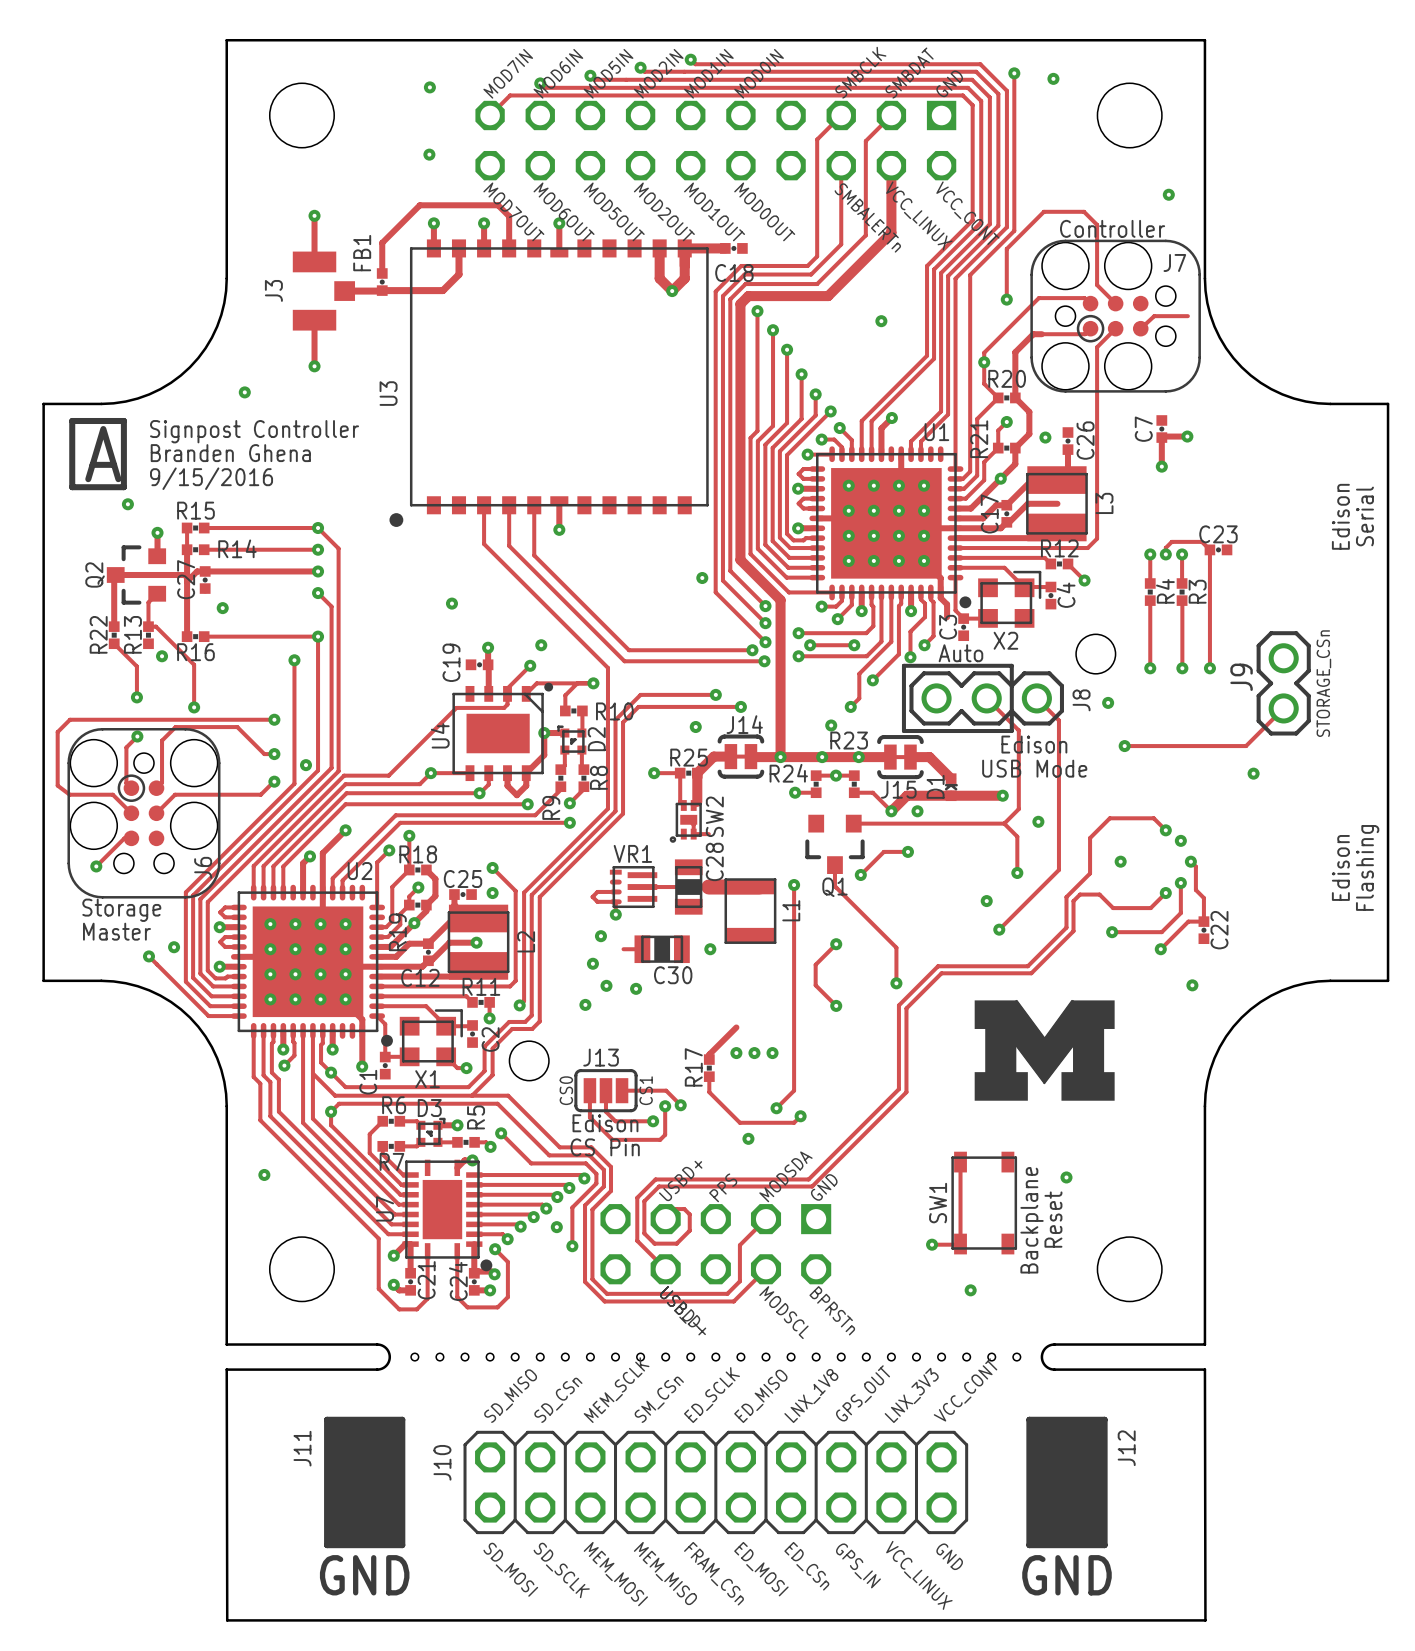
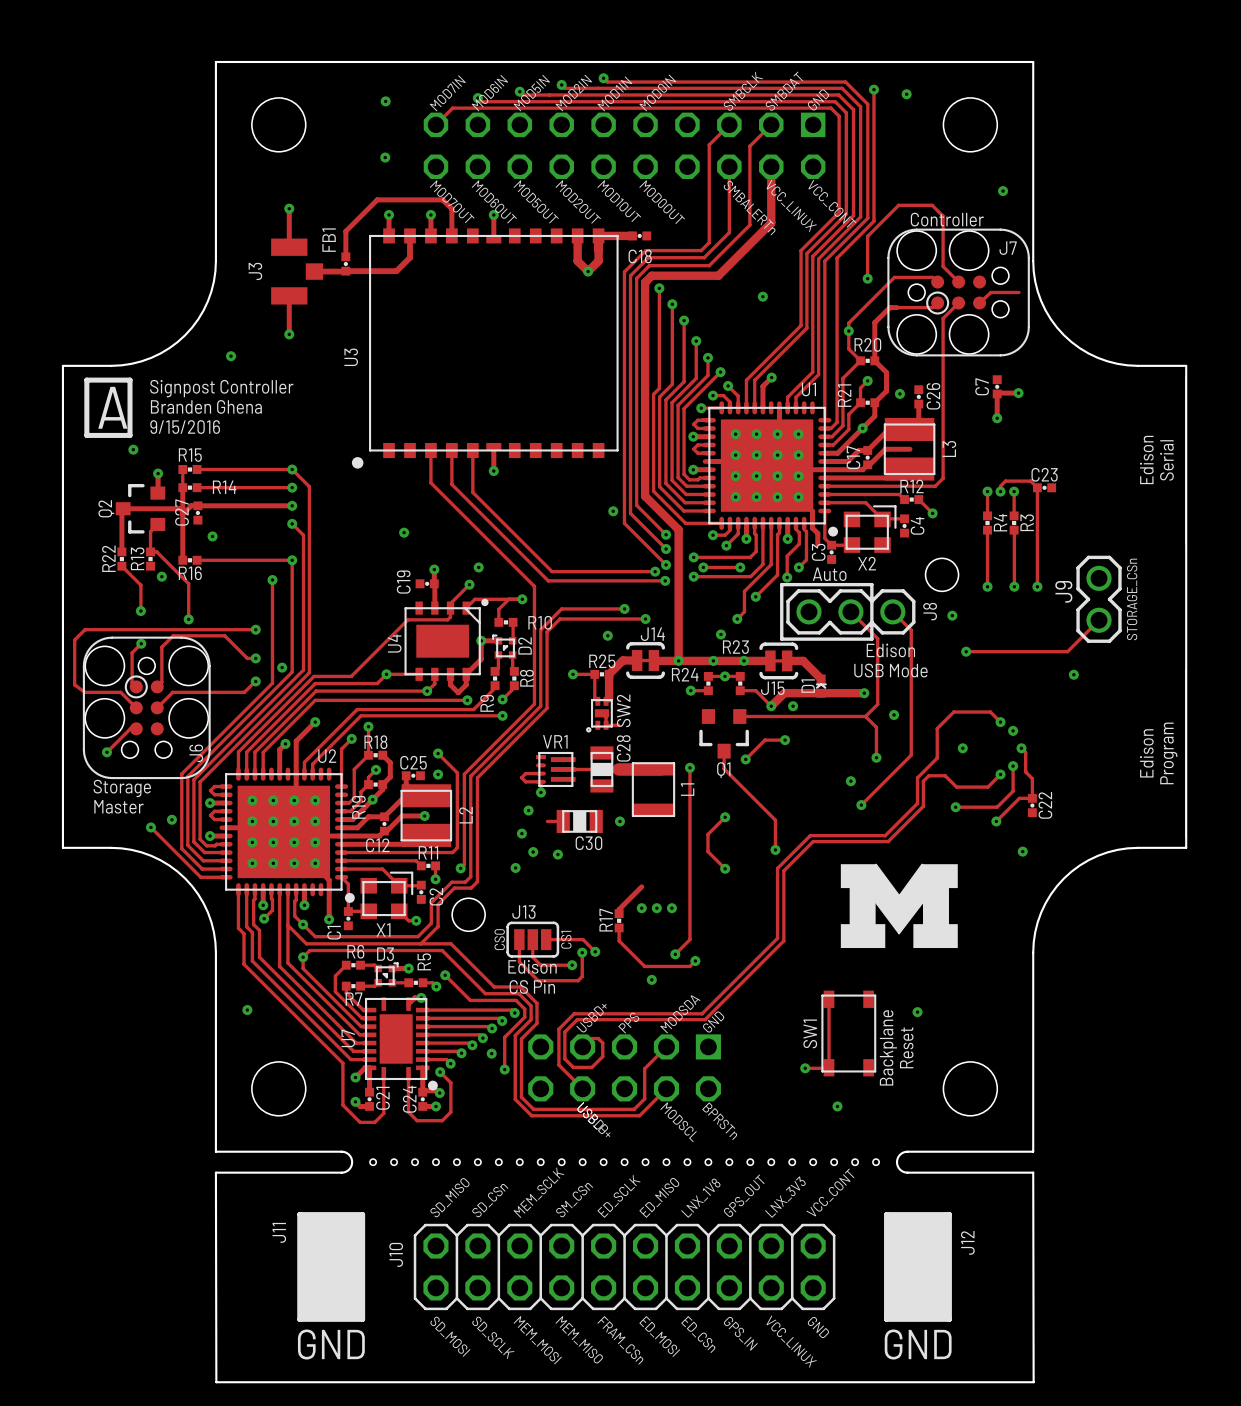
text: Flashing (1367, 867) -> Program (1168, 753)

